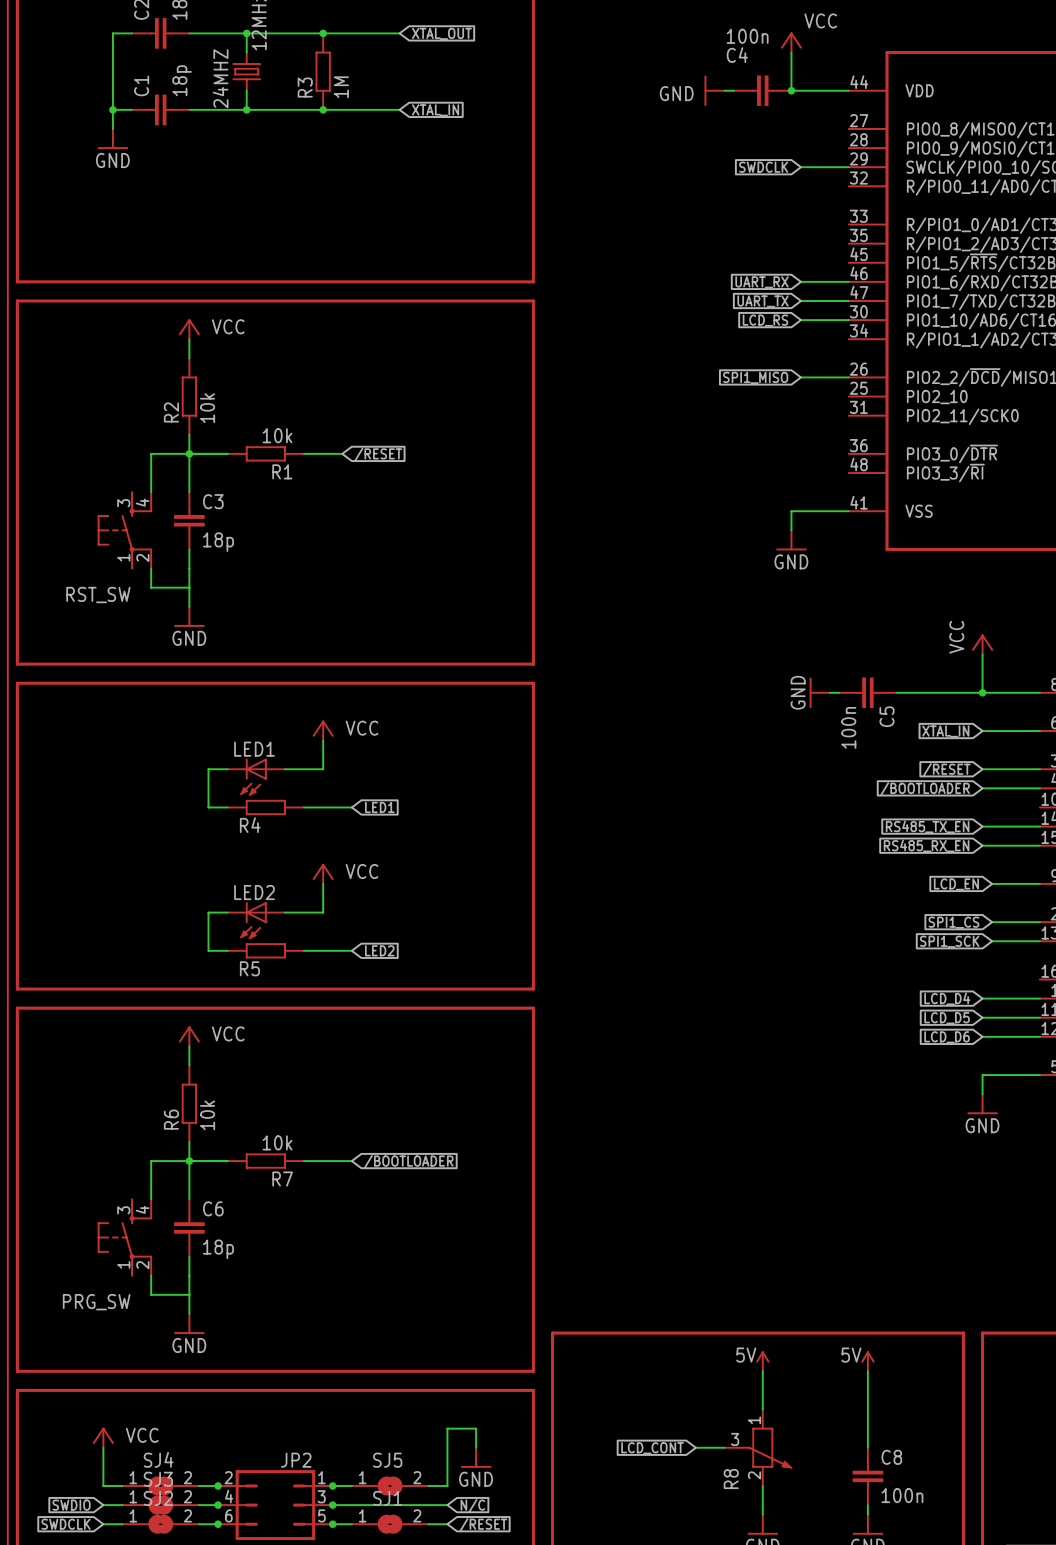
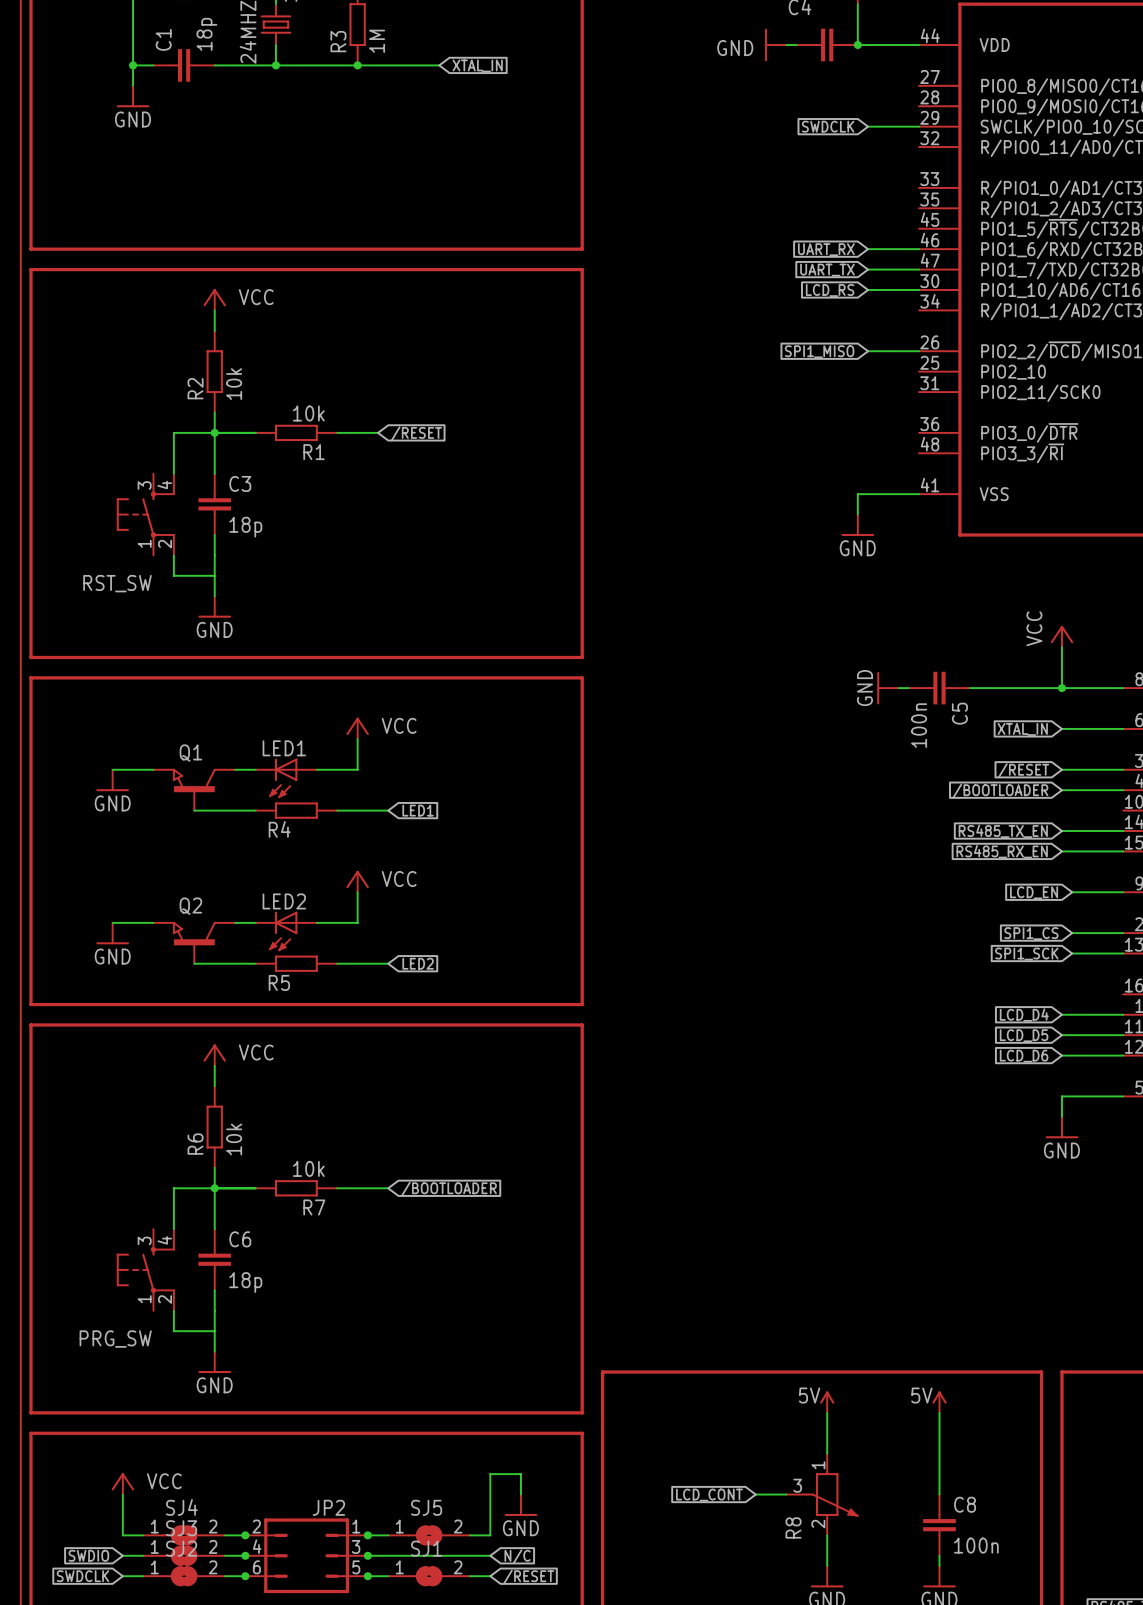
wire: none -> (112, 769) (153, 769)
wire: (208, 769) (208, 807) -> (194, 810) (235, 810)
power symbol: none -> GND (112, 780)
Q1: none -> (194, 789)
wire: none -> (112, 922) (153, 922)
wire: (208, 912) (208, 950) -> (194, 963) (235, 963)
power symbol: none -> GND (112, 933)
Q2: none -> (194, 943)

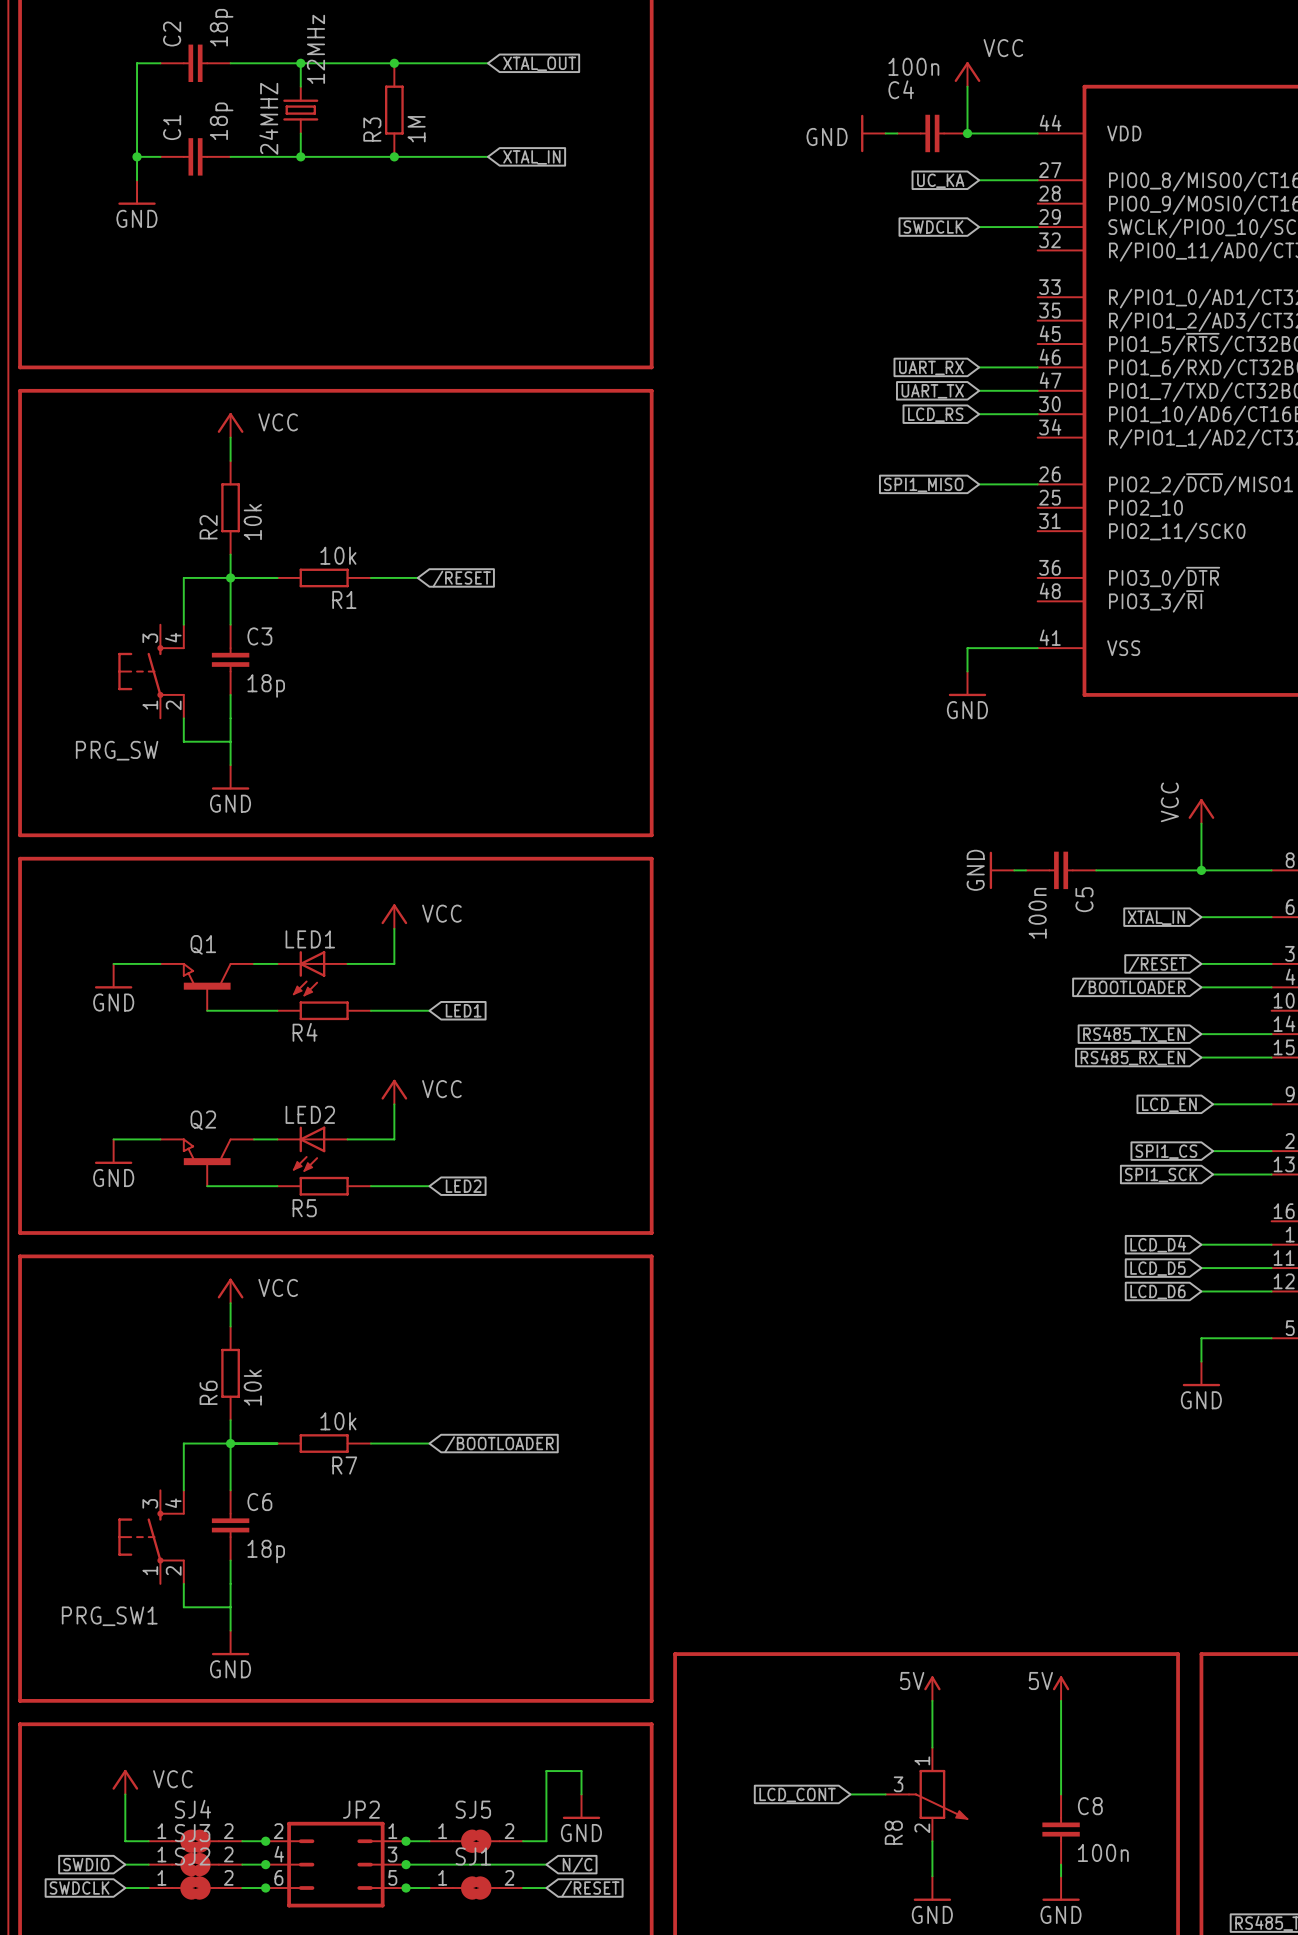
wire: none -> (979, 180) (1037, 180)
global label: none -> UC_KA (940, 180)
RST_SW name: RST_SW (117, 583) -> PRG_SW (117, 750)
PRG_SW name: PRG_SW (115, 1339) -> PRG_SW1 (109, 1616)

